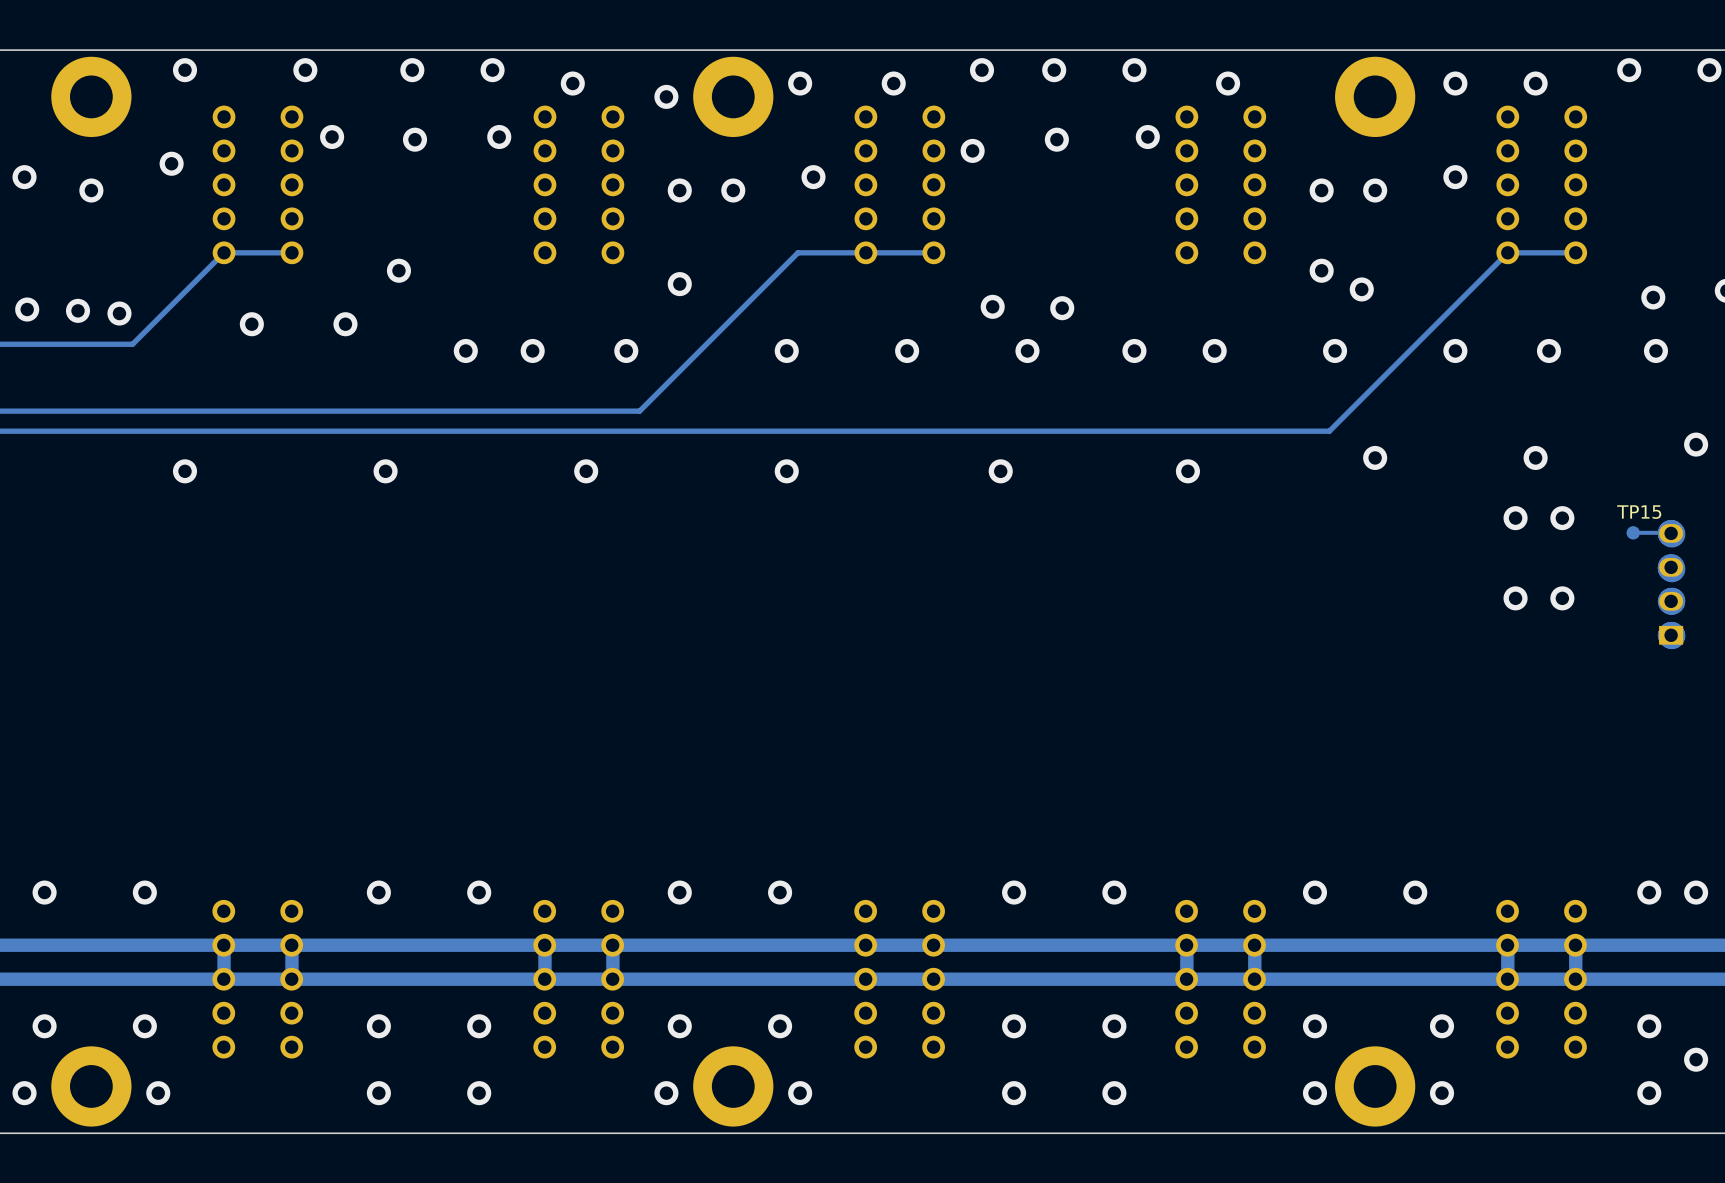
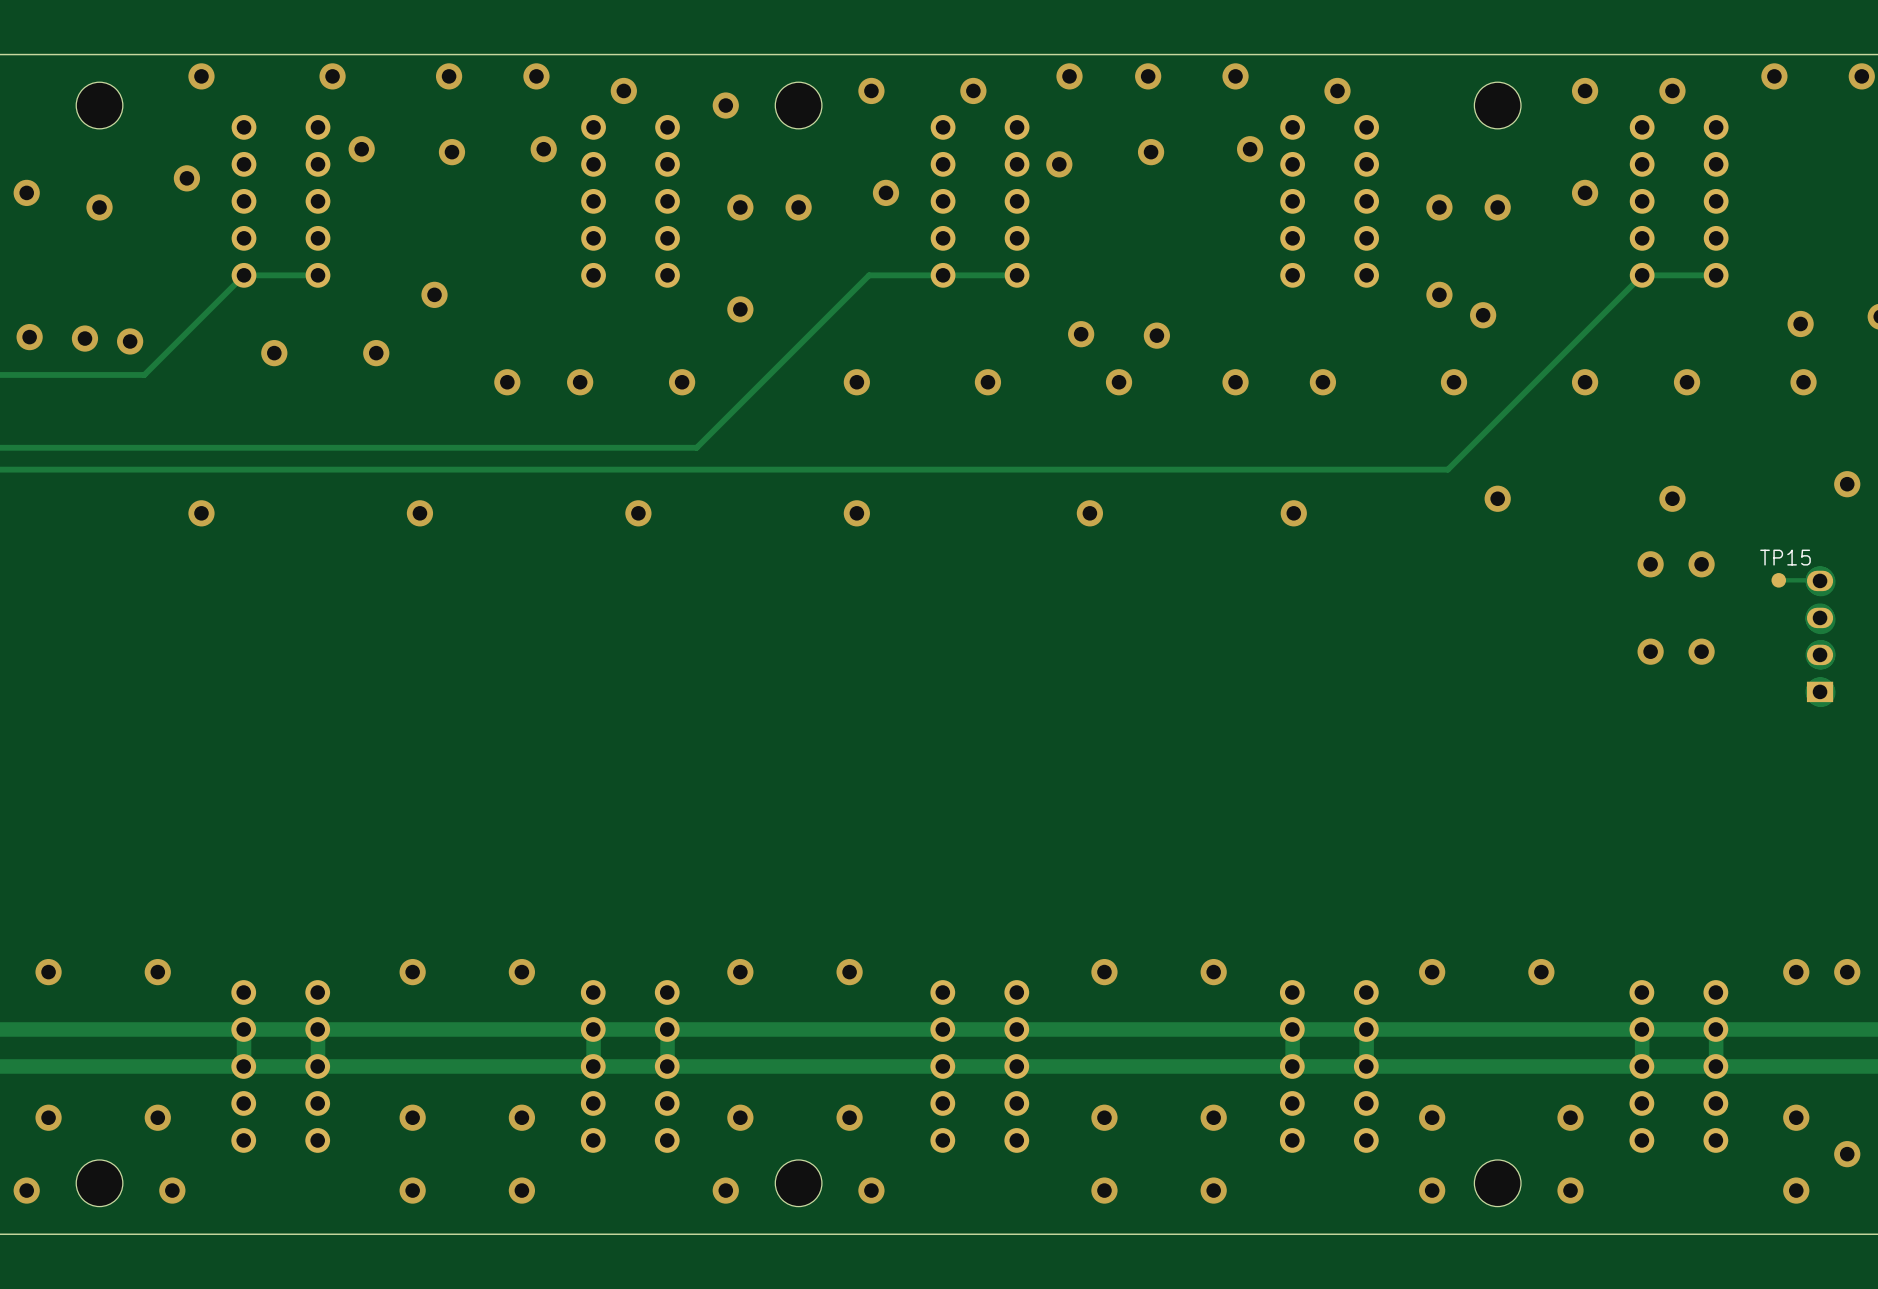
part footprint: [51, 56, 132, 138] -> [76, 82, 123, 129]
part footprint: [693, 56, 774, 138] -> [775, 82, 822, 129]
part footprint: [1335, 56, 1416, 138] -> [1474, 82, 1521, 129]
part footprint: [51, 1046, 132, 1127] -> [76, 1159, 123, 1207]
part footprint: [693, 1046, 774, 1127] -> [775, 1159, 822, 1207]
part footprint: [1335, 1046, 1416, 1127] -> [1474, 1159, 1521, 1207]

